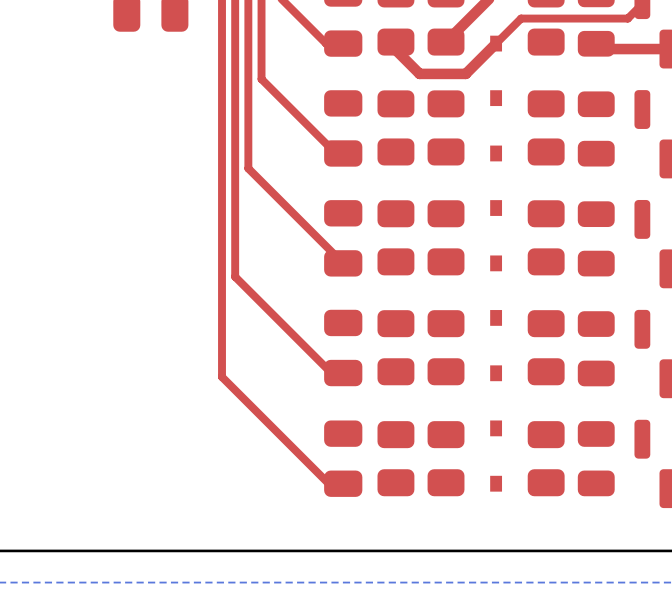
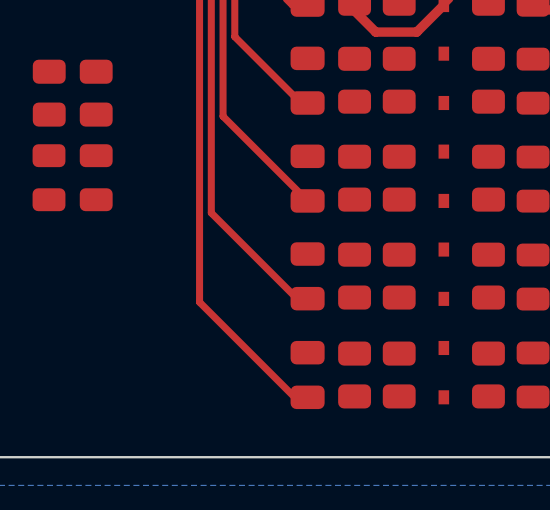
part: none -> (49, 93)
part: none -> (96, 93)
part: none -> (49, 177)
part: none -> (96, 177)

